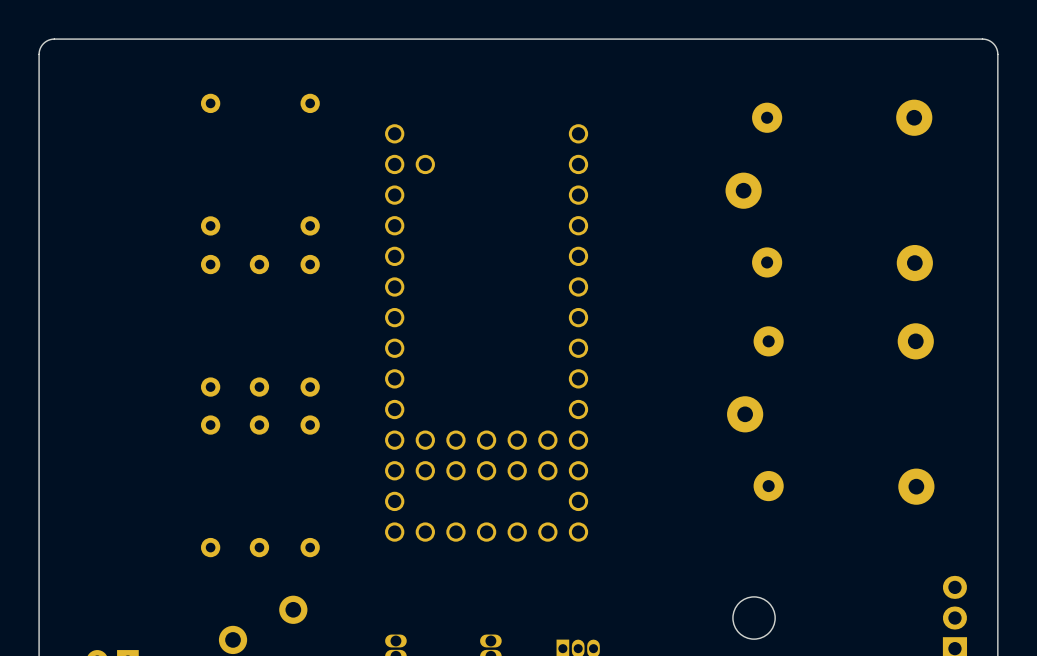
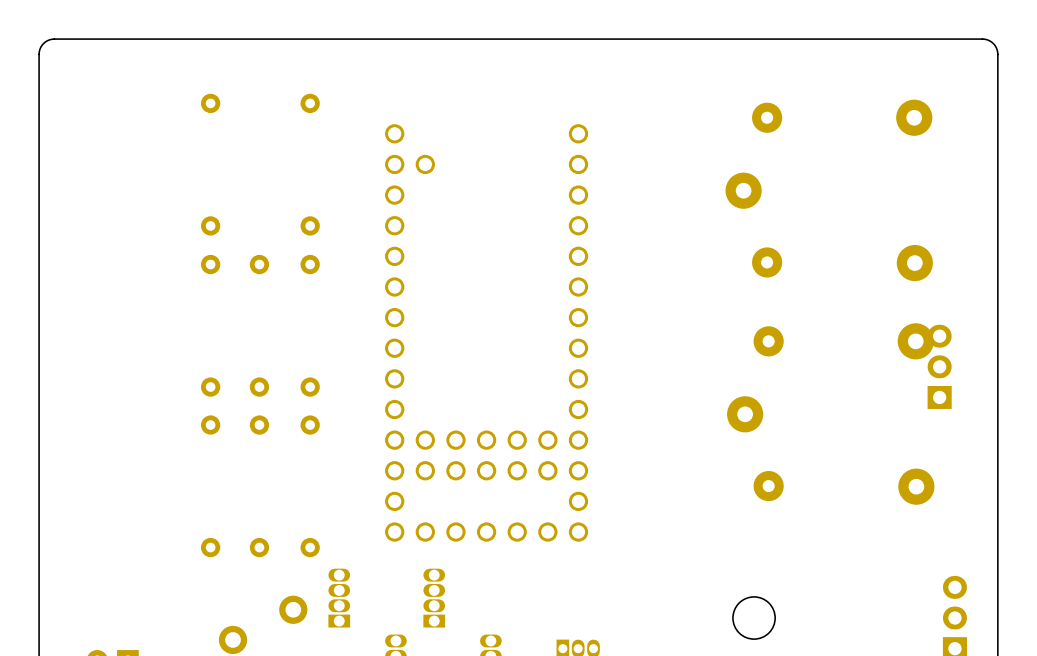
part: none -> (939, 366)
part: none -> (339, 598)
part: none -> (434, 598)

